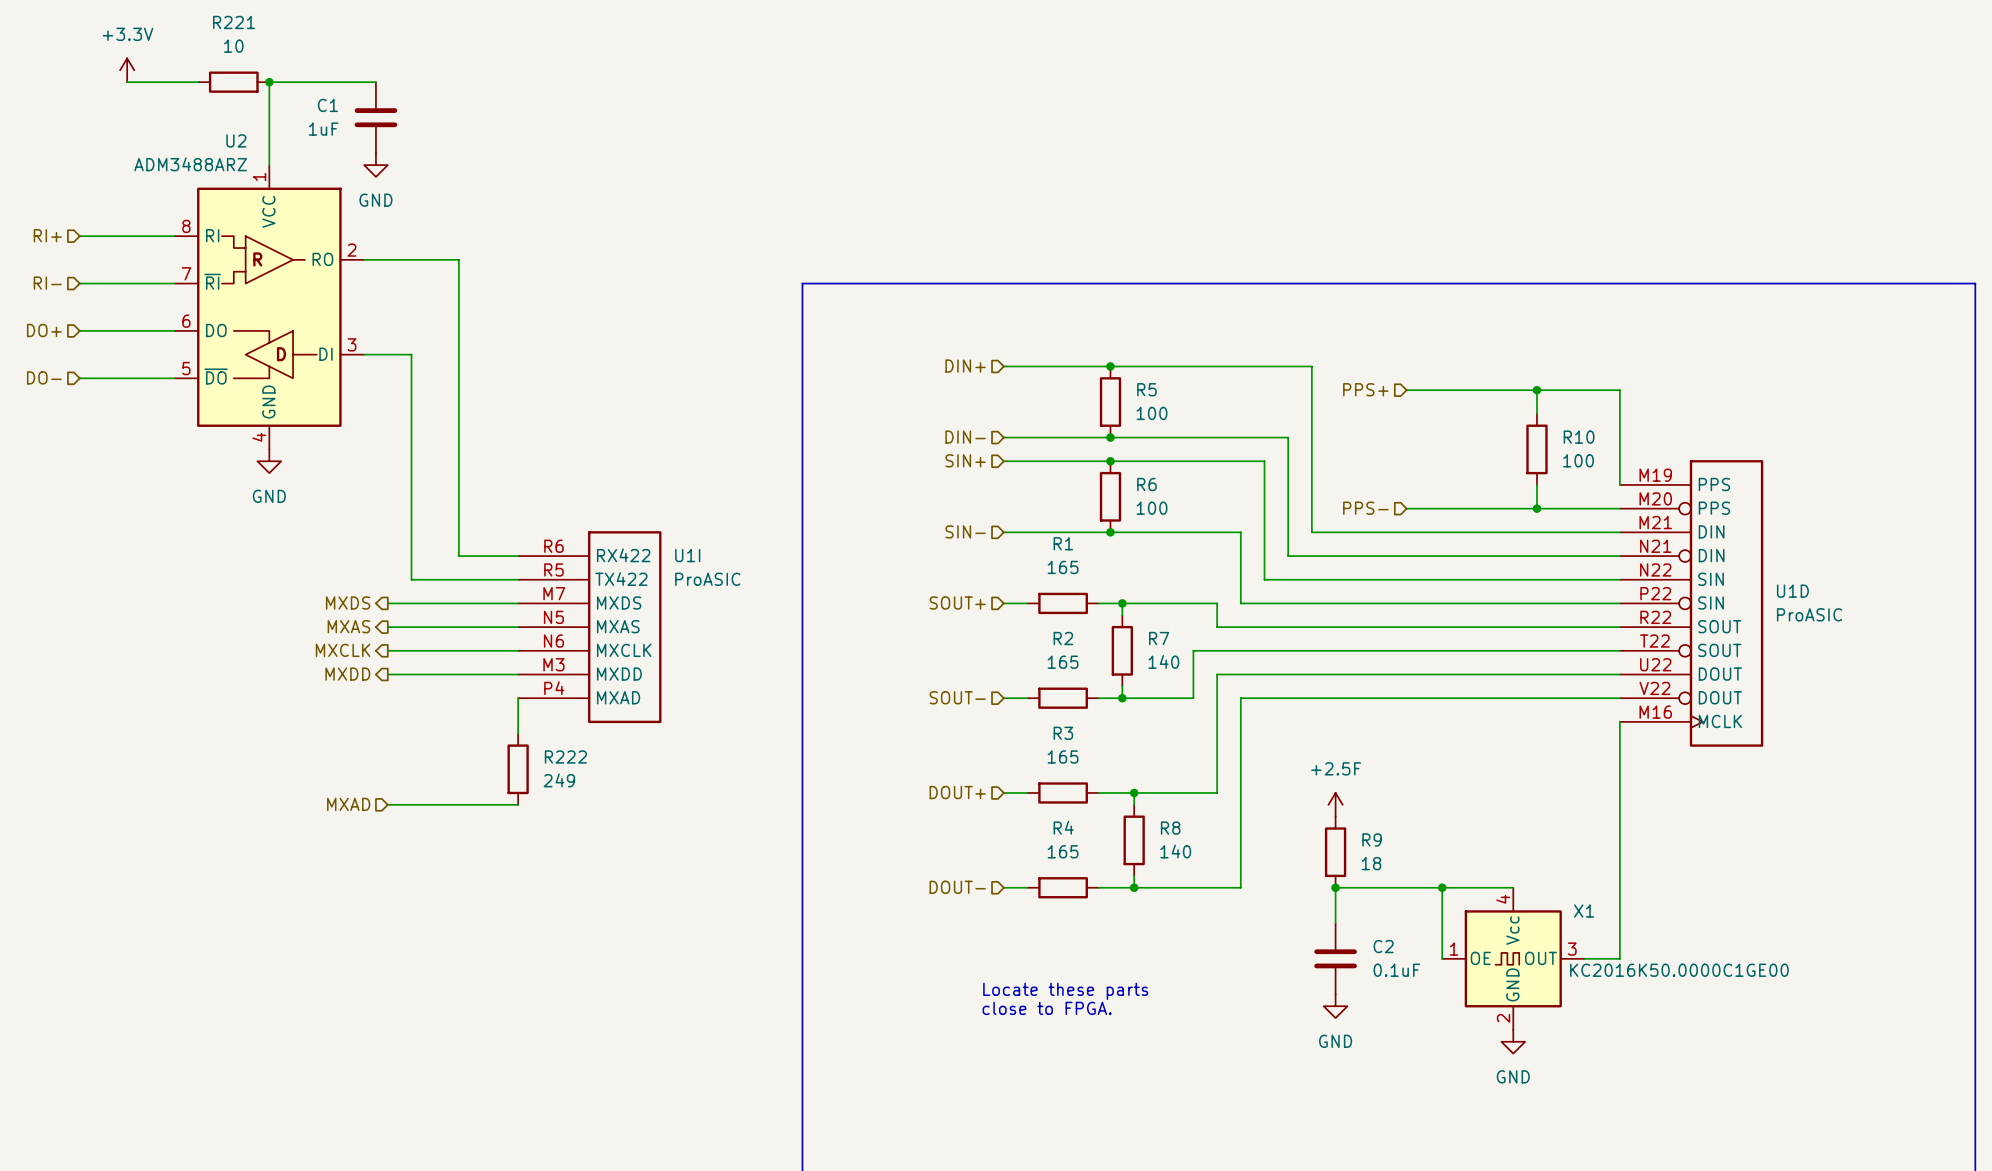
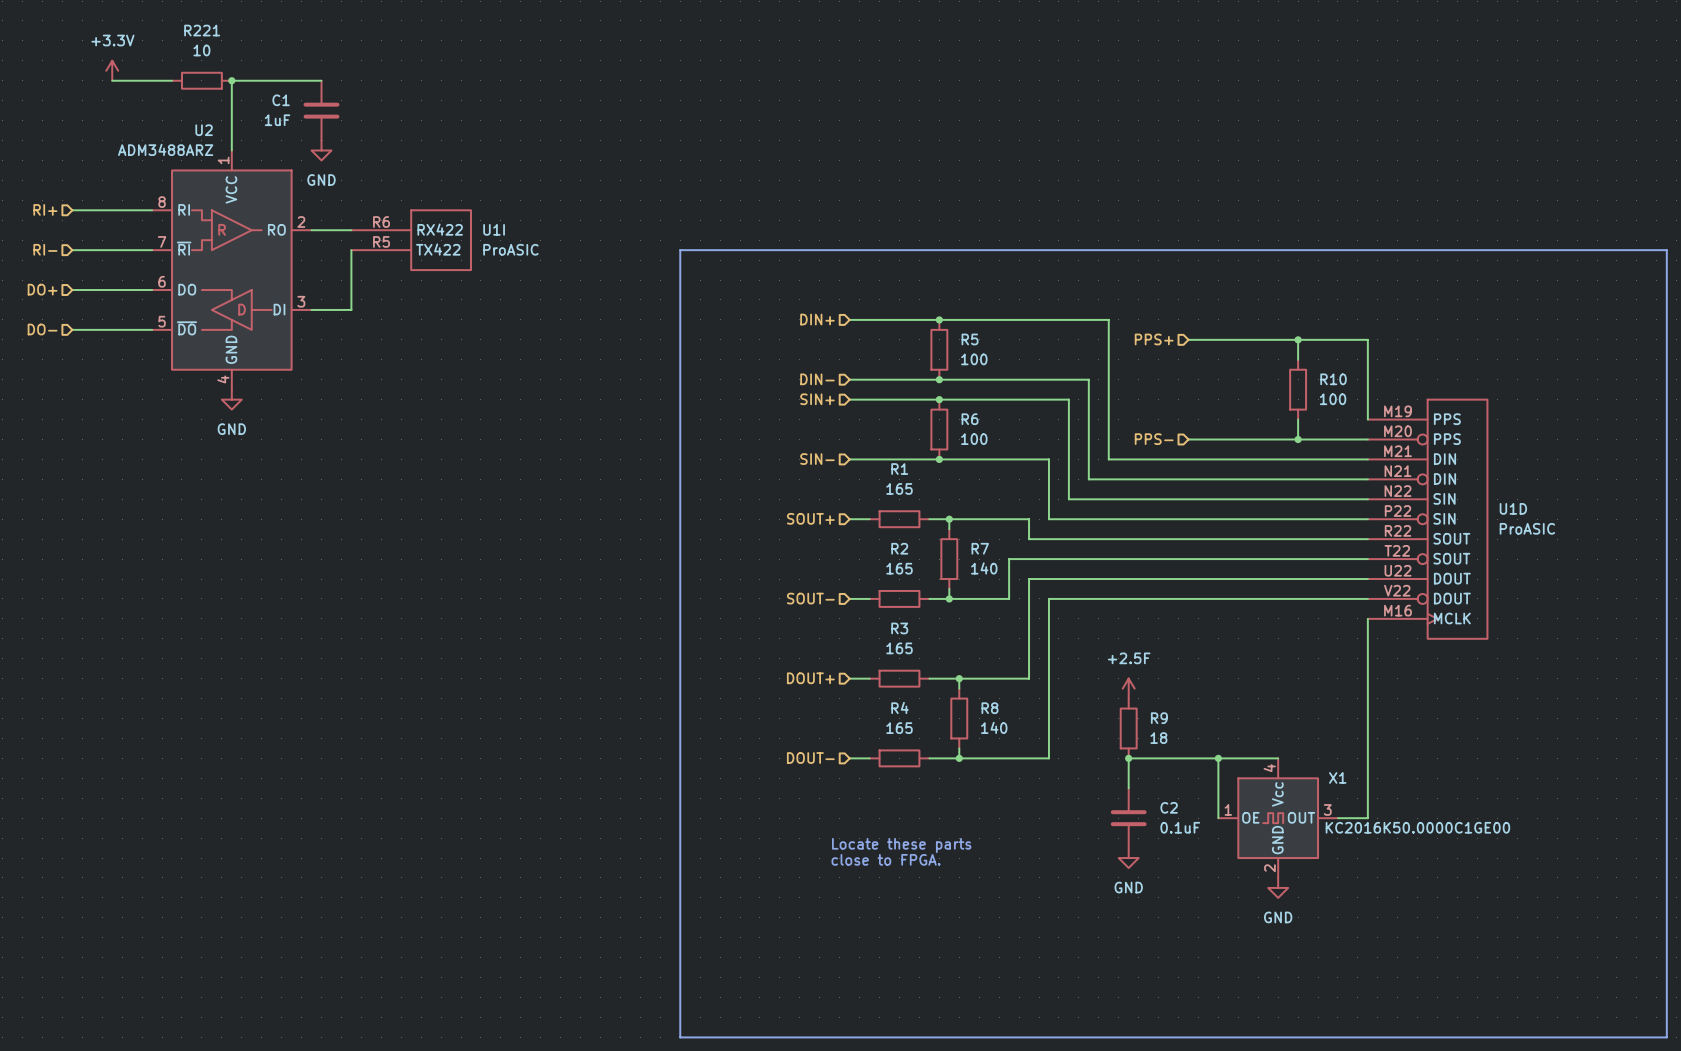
wire: (411, 259) (458, 259) (458, 556) (518, 556) -> none
wire: (411, 354) (411, 579) (518, 579) -> (351, 309) (351, 250)
U1I symbol: [518, 531, 662, 724] -> [351, 209, 472, 272]
U1I name position: U1I (687, 555) -> U1I (494, 229)
U1I value position: ProASIC (707, 579) -> ProASIC (510, 249)
hierarchical label: MXDS (348, 602) -> none
wire: (387, 603) (518, 603) -> none
hierarchical label: MXAS (348, 626) -> none
wire: (387, 627) (518, 627) -> none
hierarchical label: MXCLK (343, 650) -> none
wire: (387, 650) (518, 650) -> none
hierarchical label: MXDD (347, 674) -> none
wire: (387, 674) (518, 674) -> none
wire: (518, 698) (518, 733) -> none
R222: 249 (518, 769) -> none
hierarchical label: MXAD (348, 804) -> none
wire: (387, 804) (518, 804) -> none

